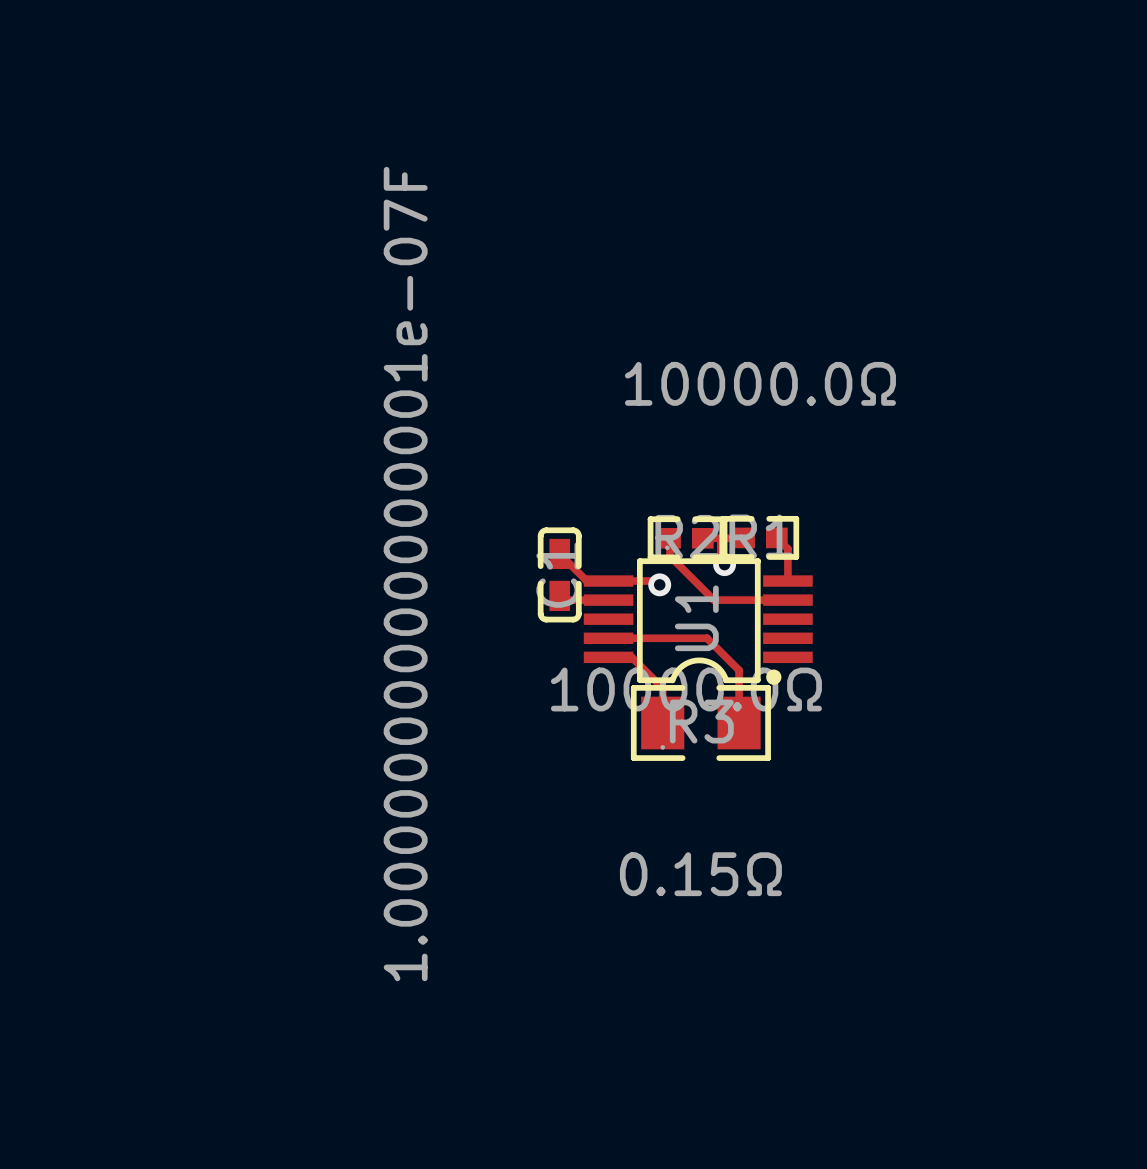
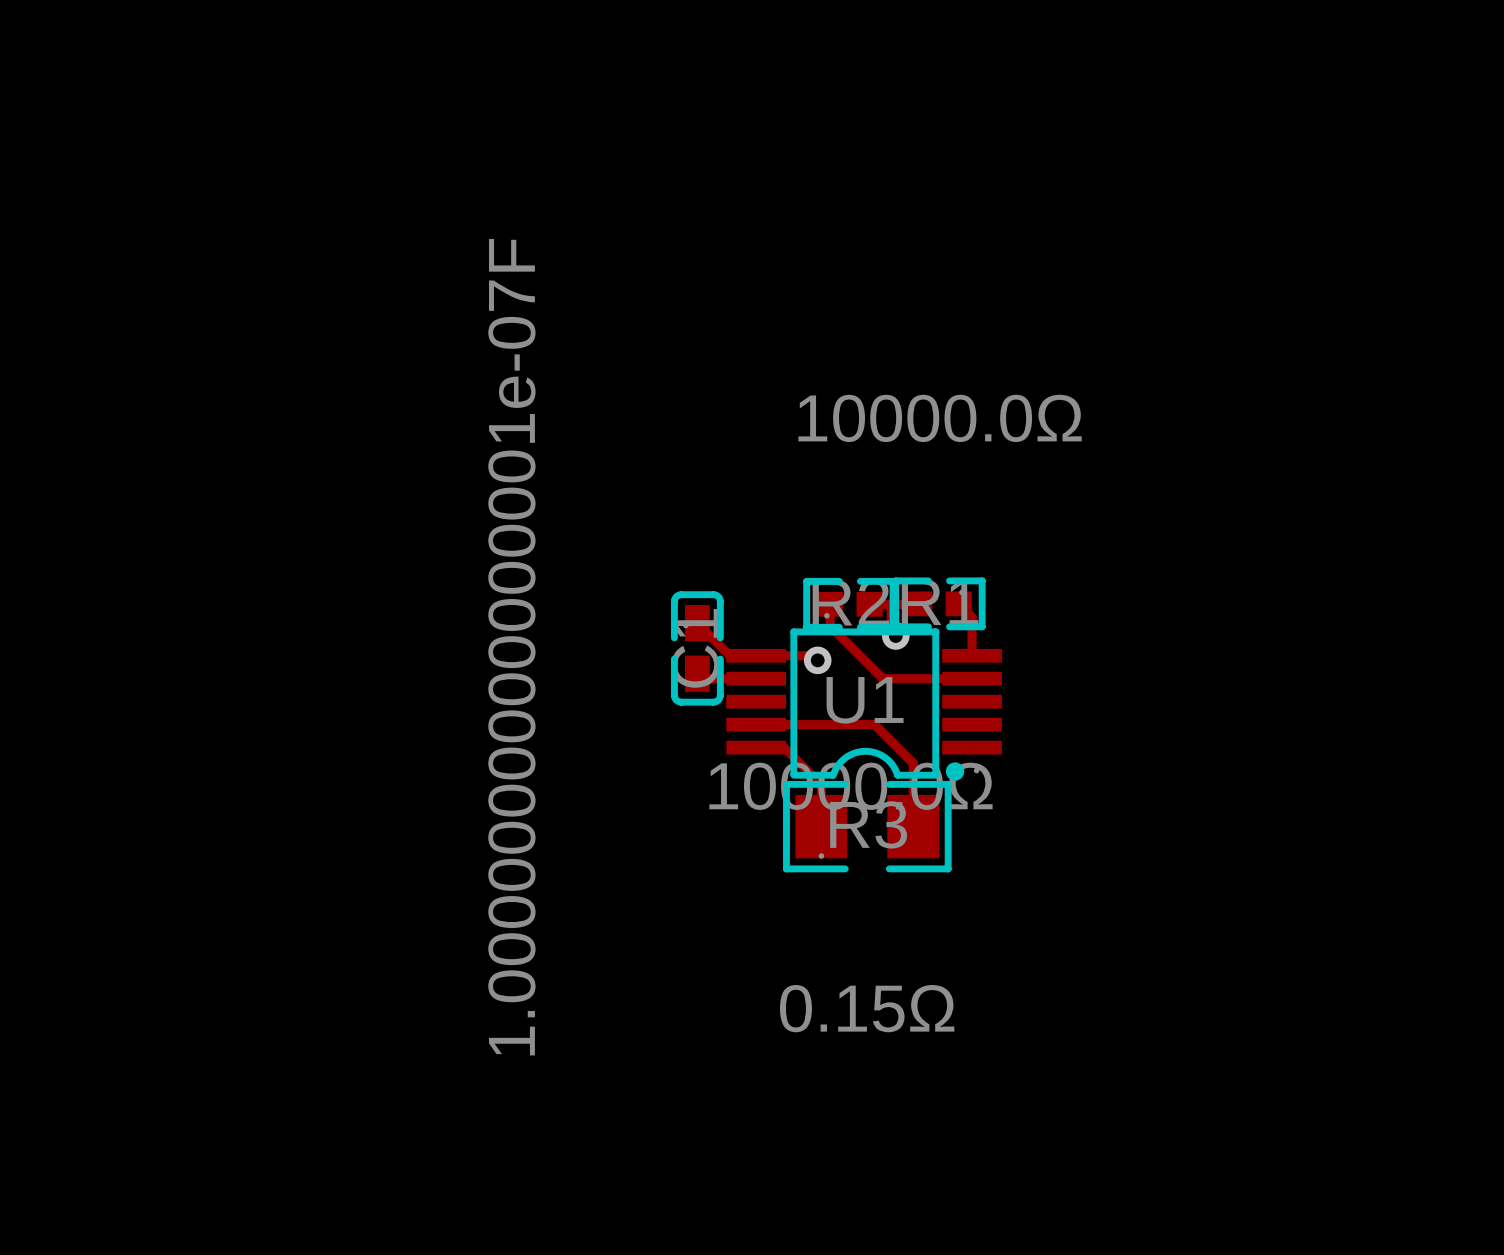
U1 name rotation: 0° (696, 618) -> 90° clockwise (865, 700)

